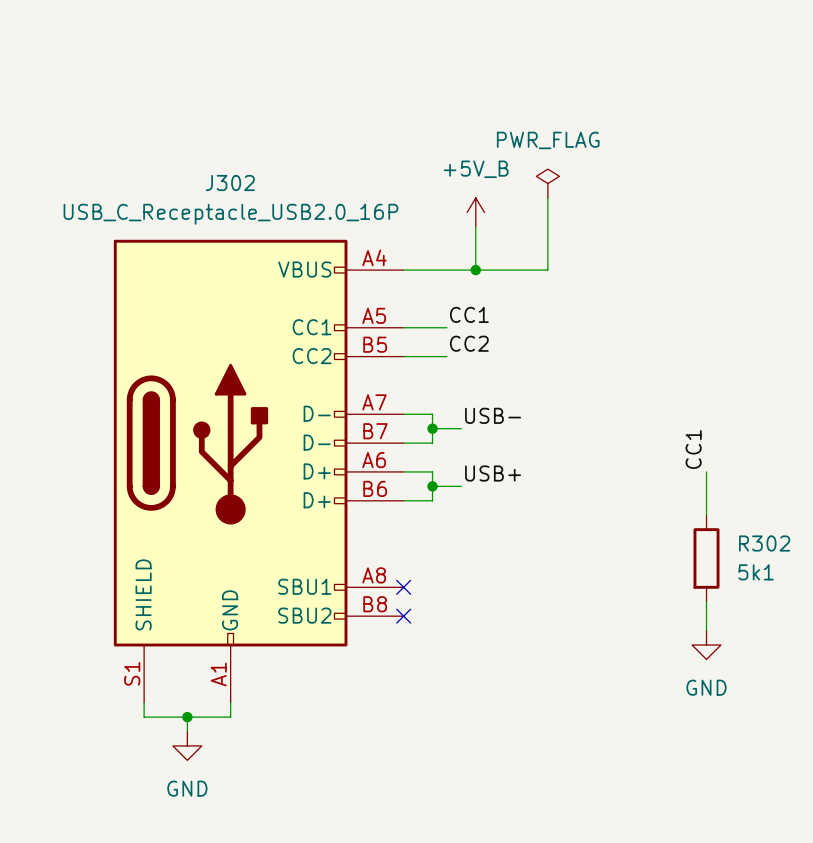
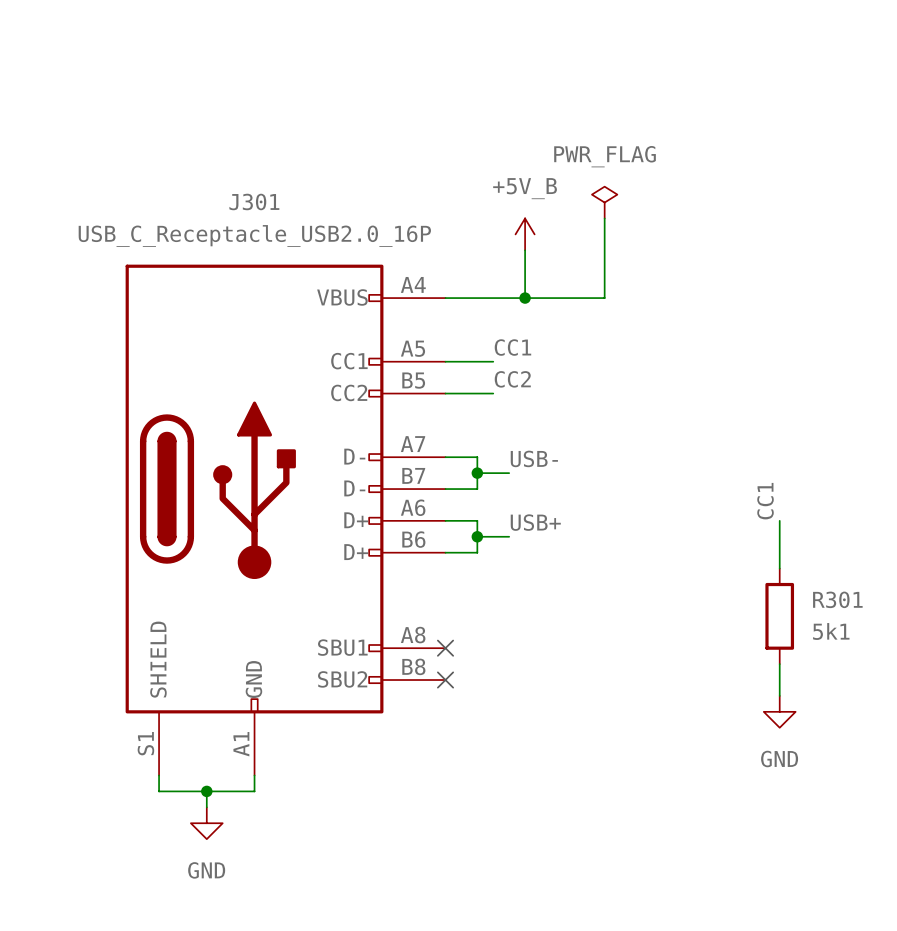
J302 name: J302 (230, 183) -> J301 (254, 201)
R302 name: R302 (764, 543) -> R301 (837, 599)

